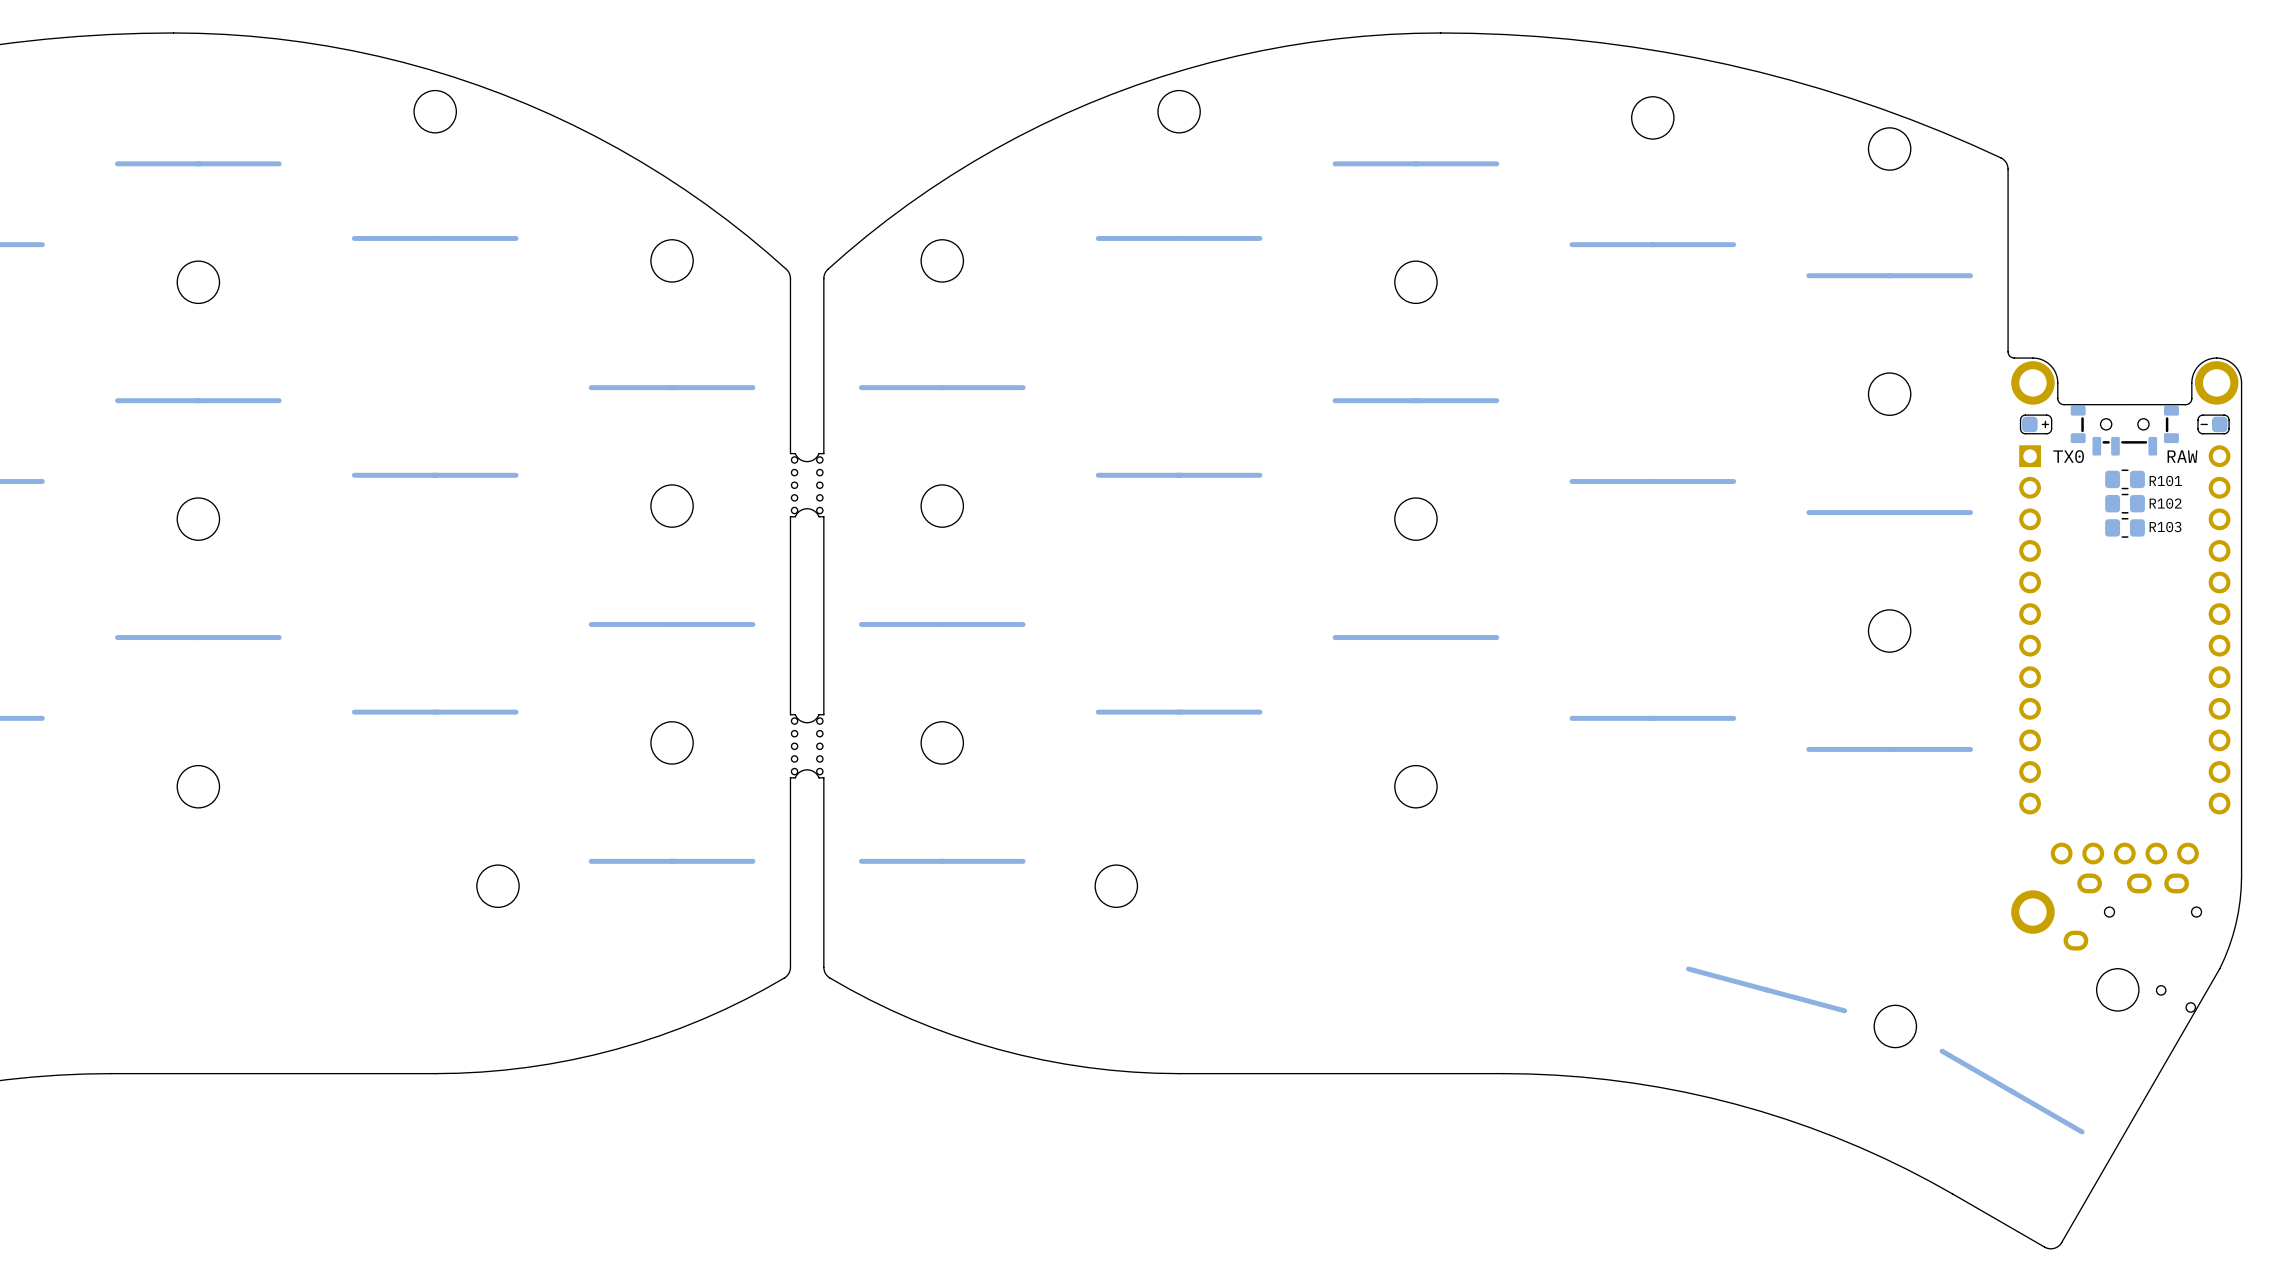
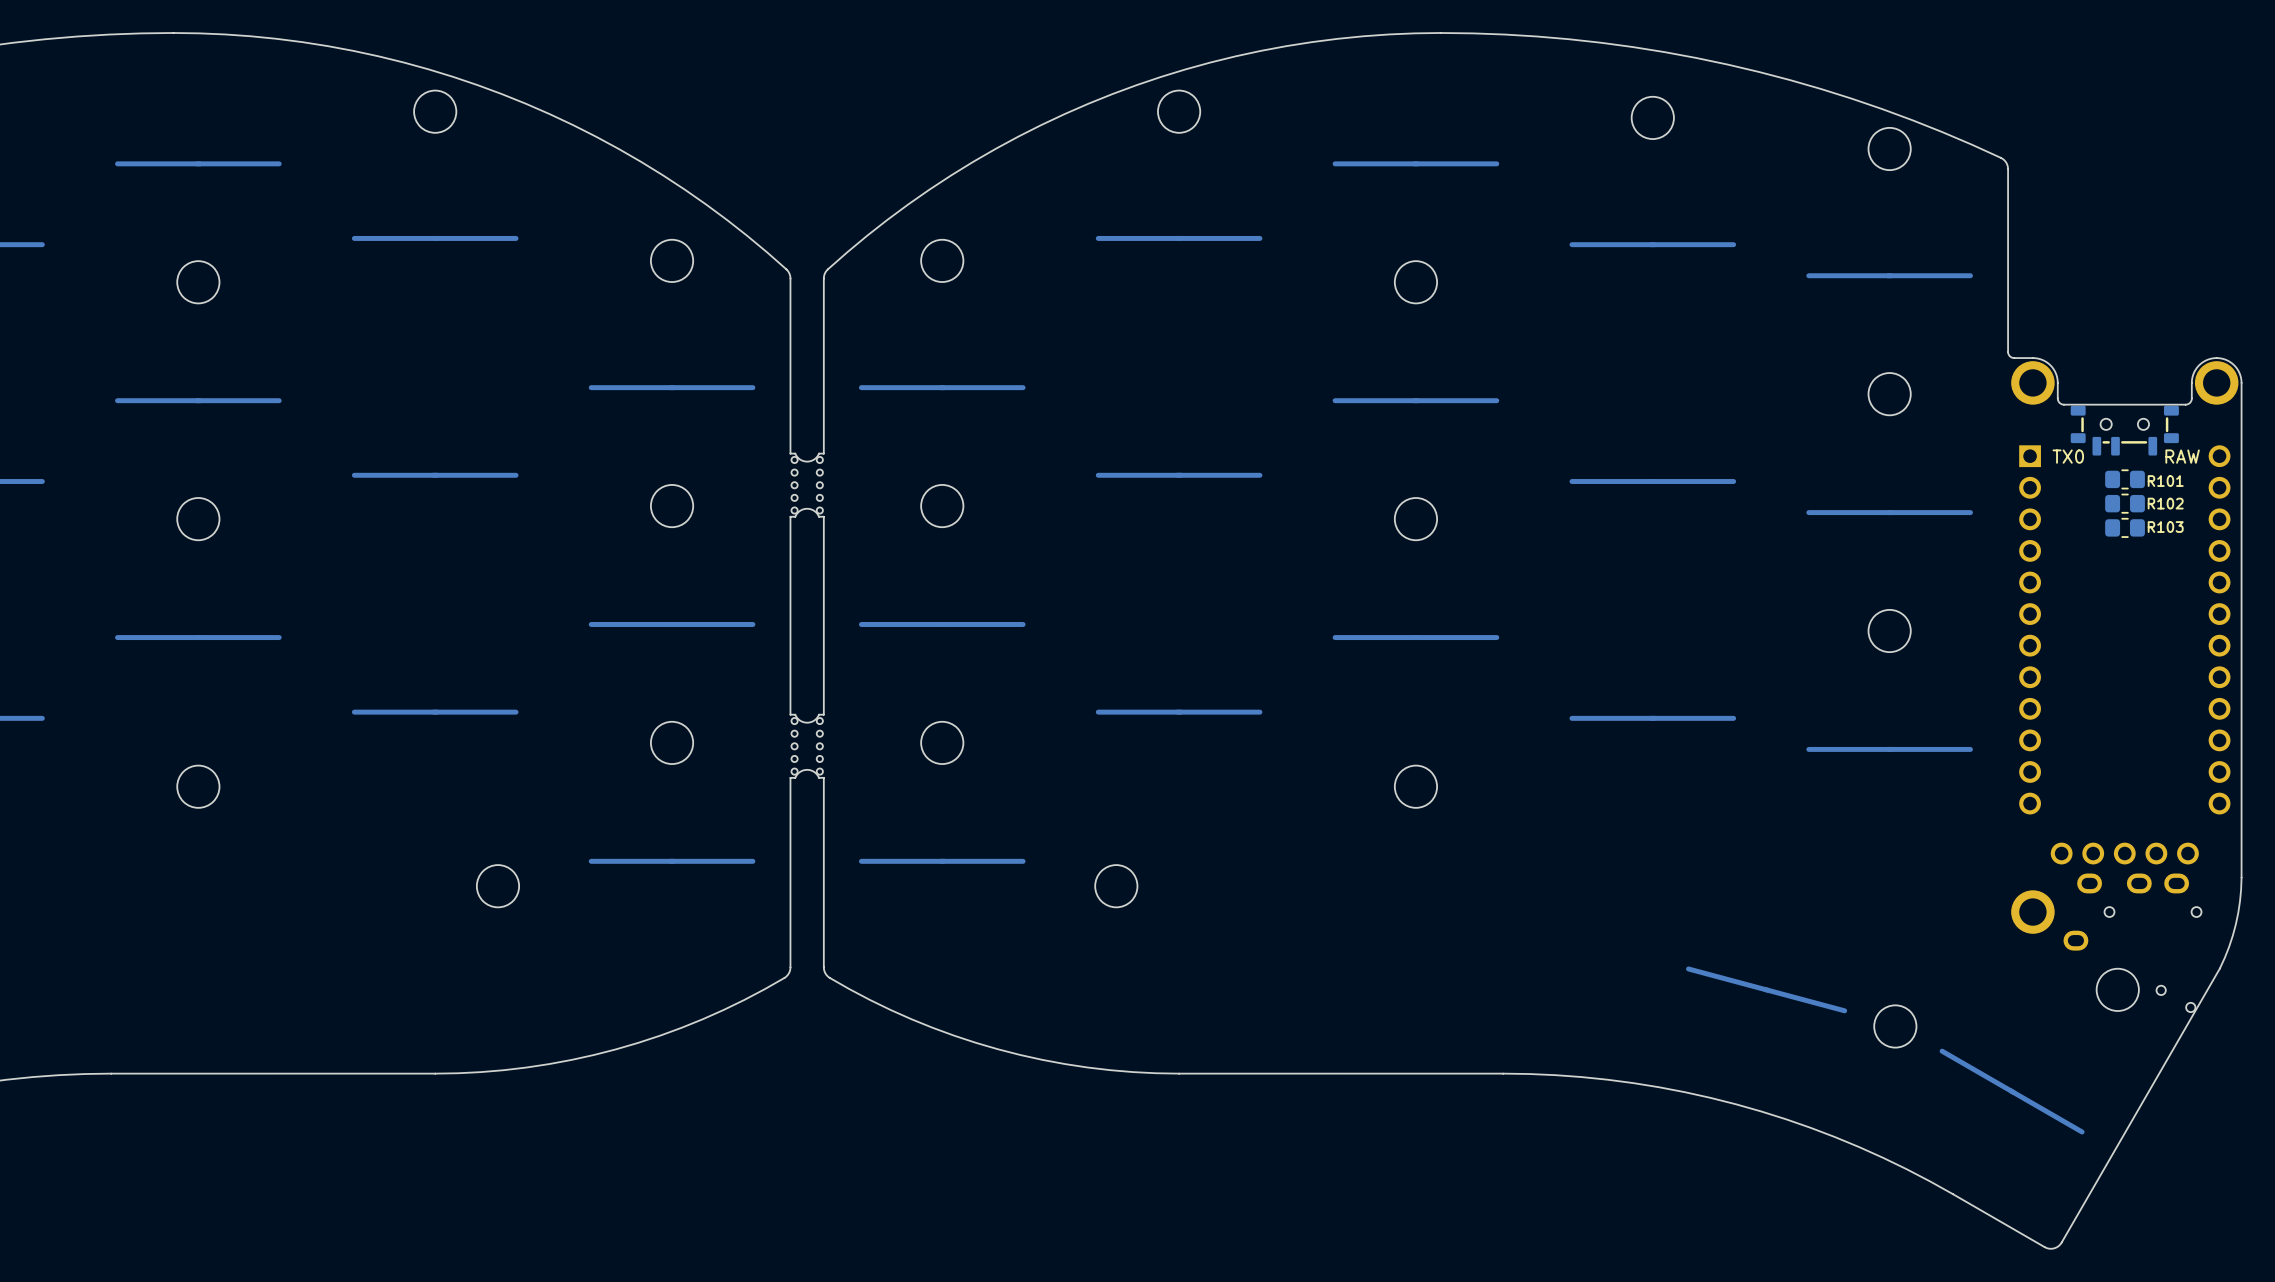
part: (2036, 424) -> none
part: (2213, 424) -> none

